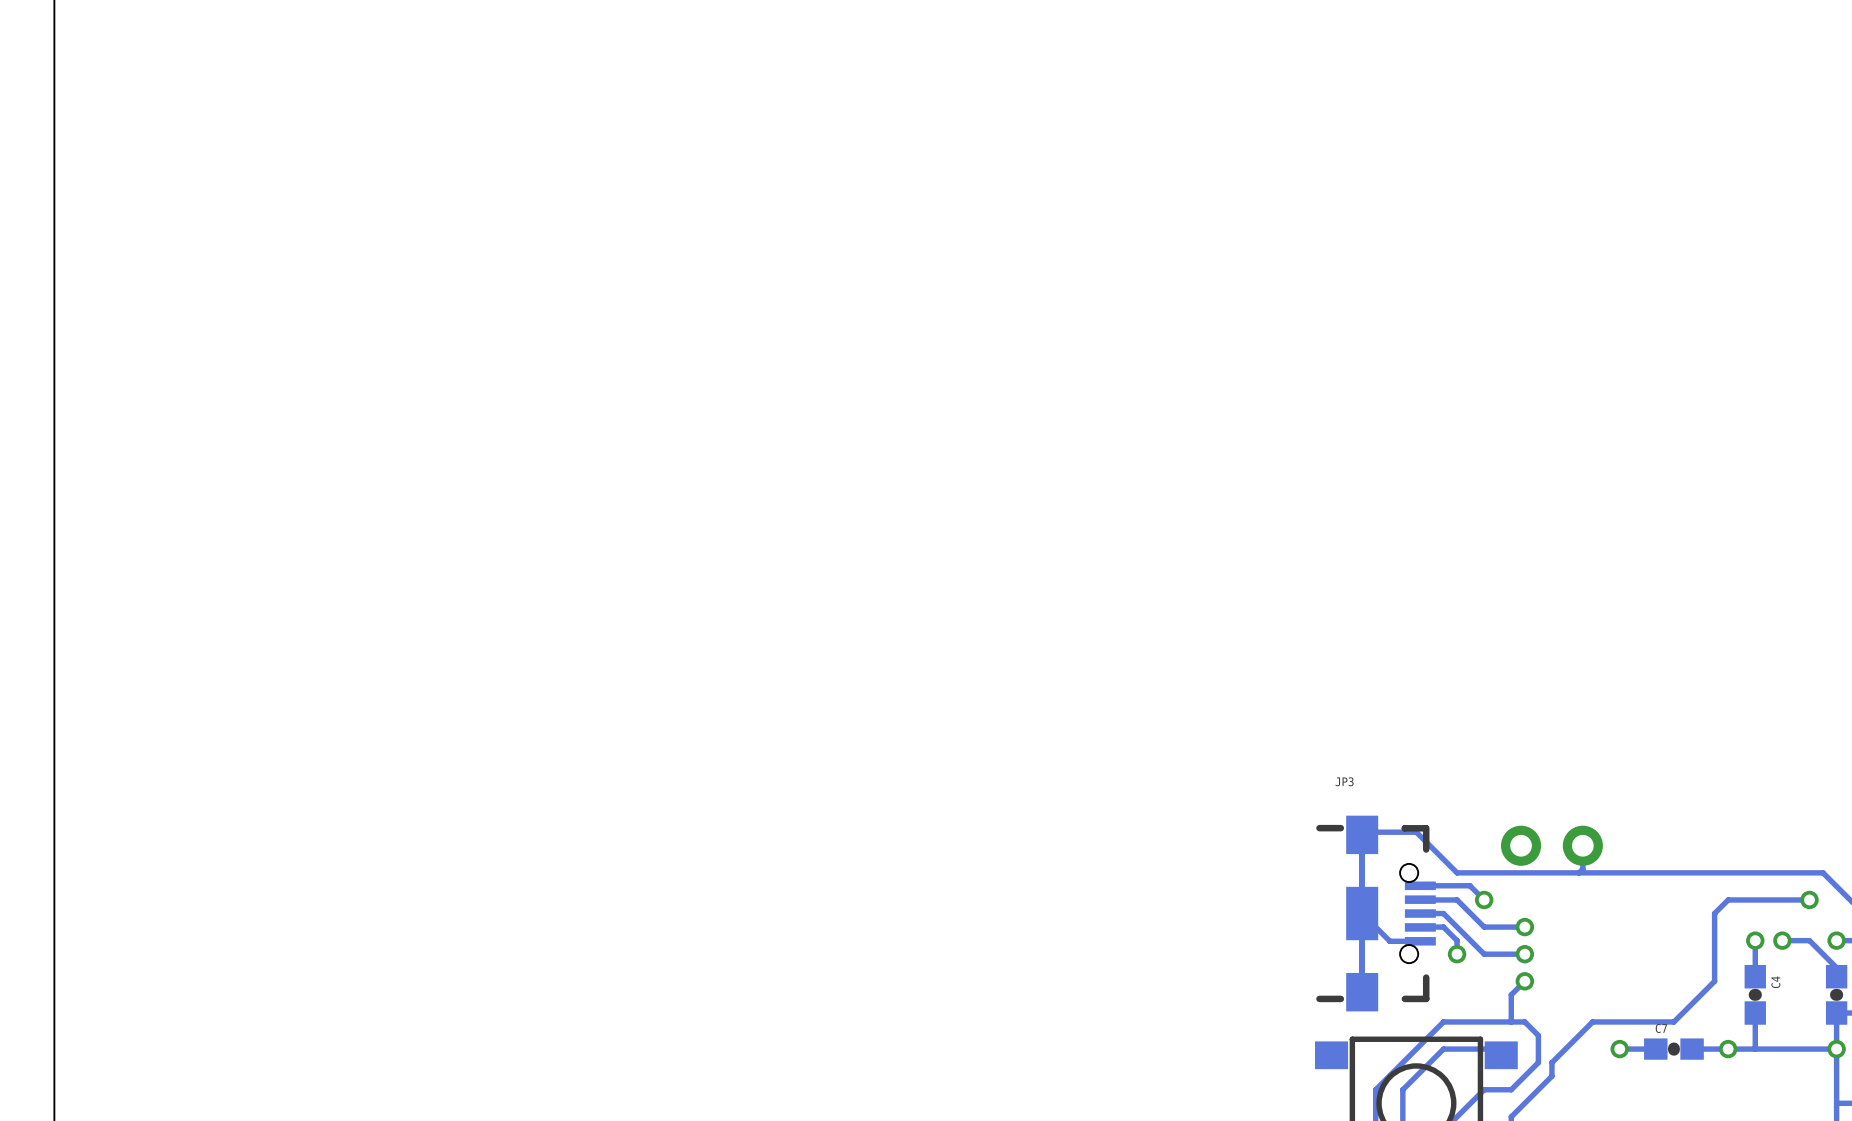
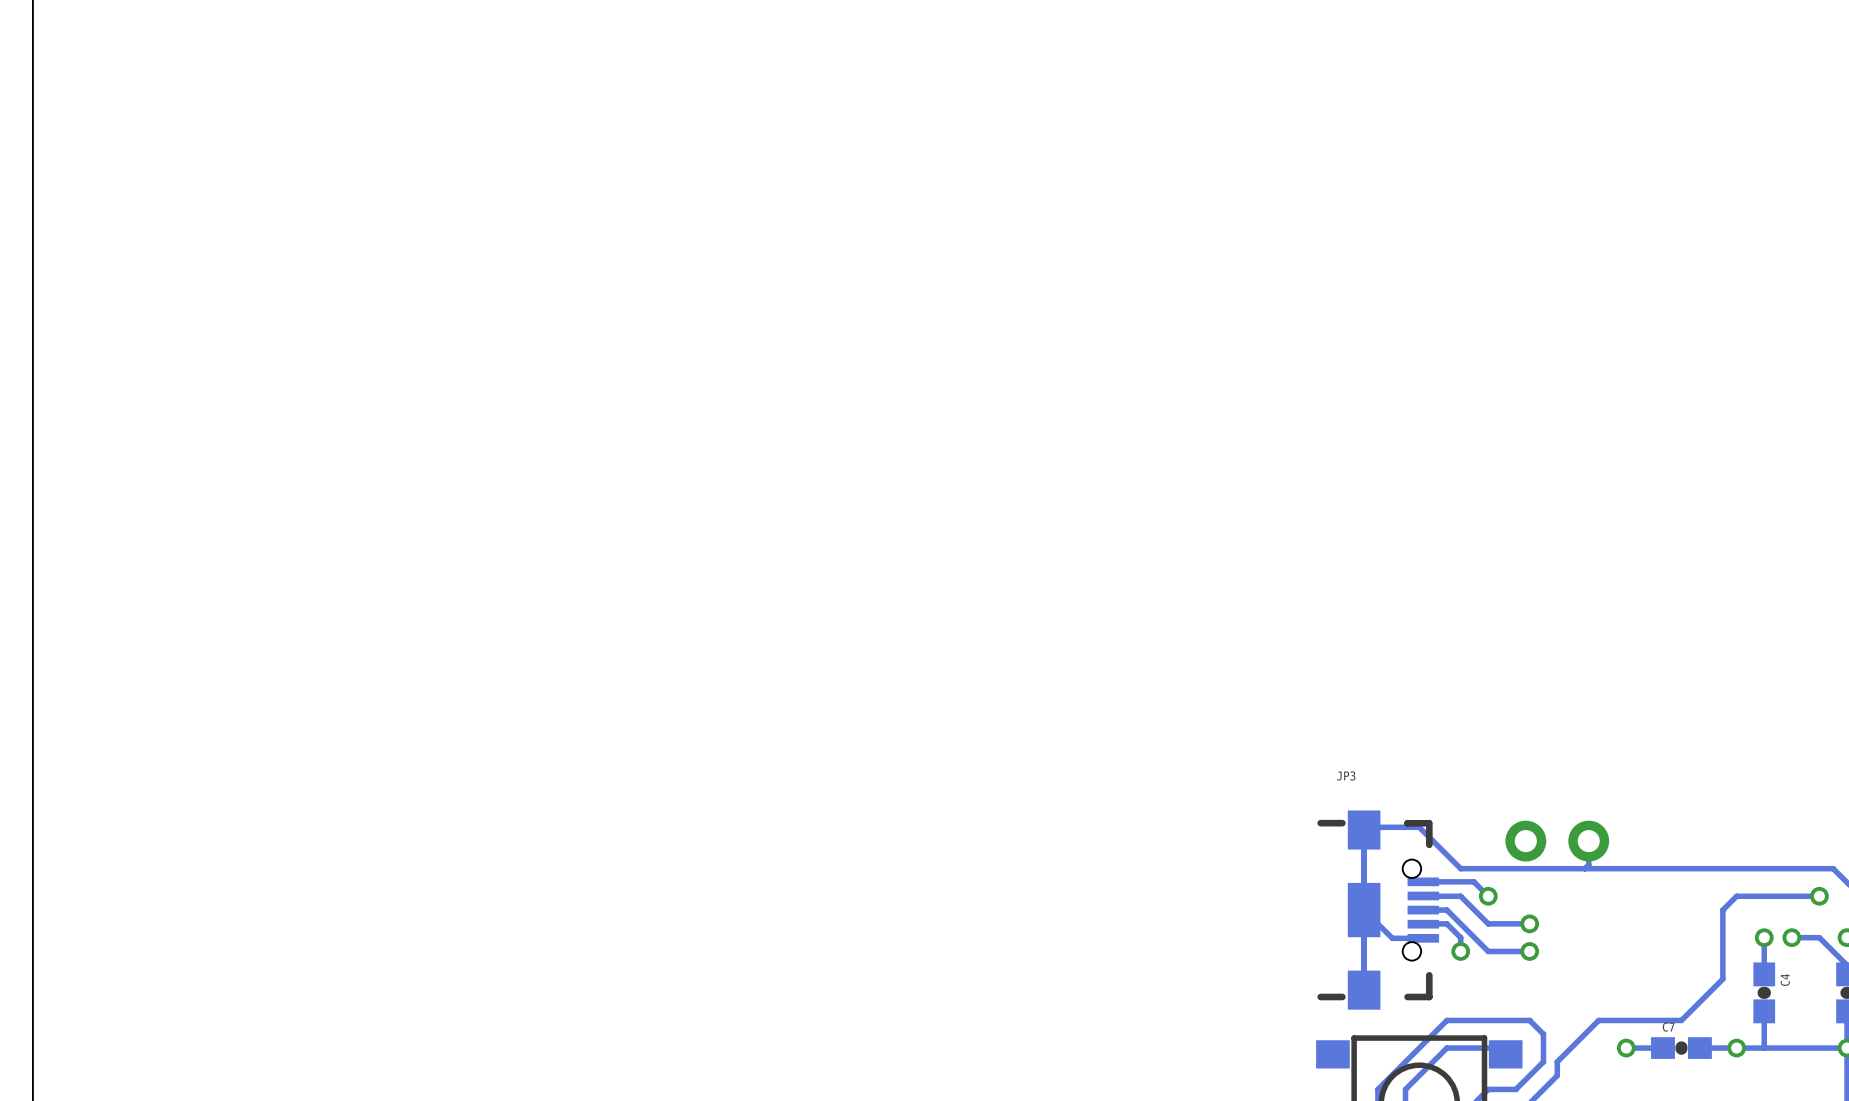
track: (1524, 981) (1511, 994) (1511, 1021) -> none
via: (1524, 981) -> none

